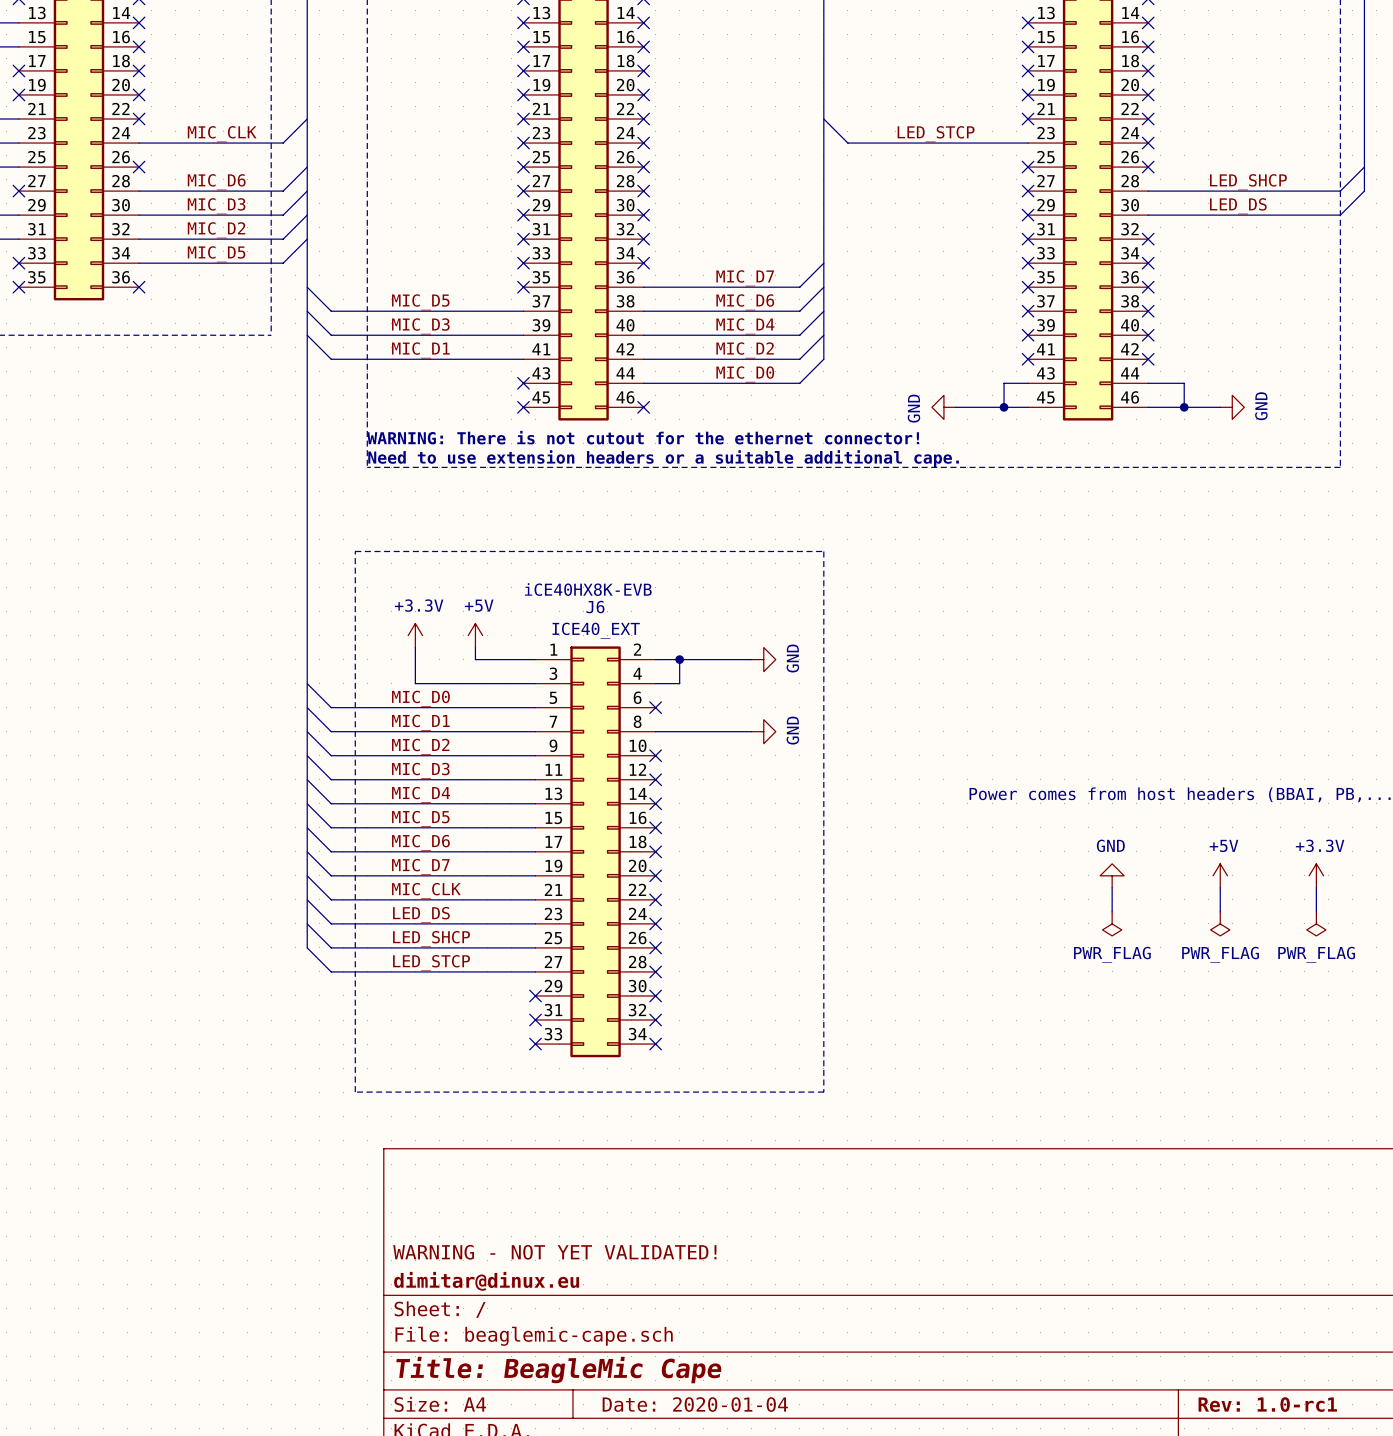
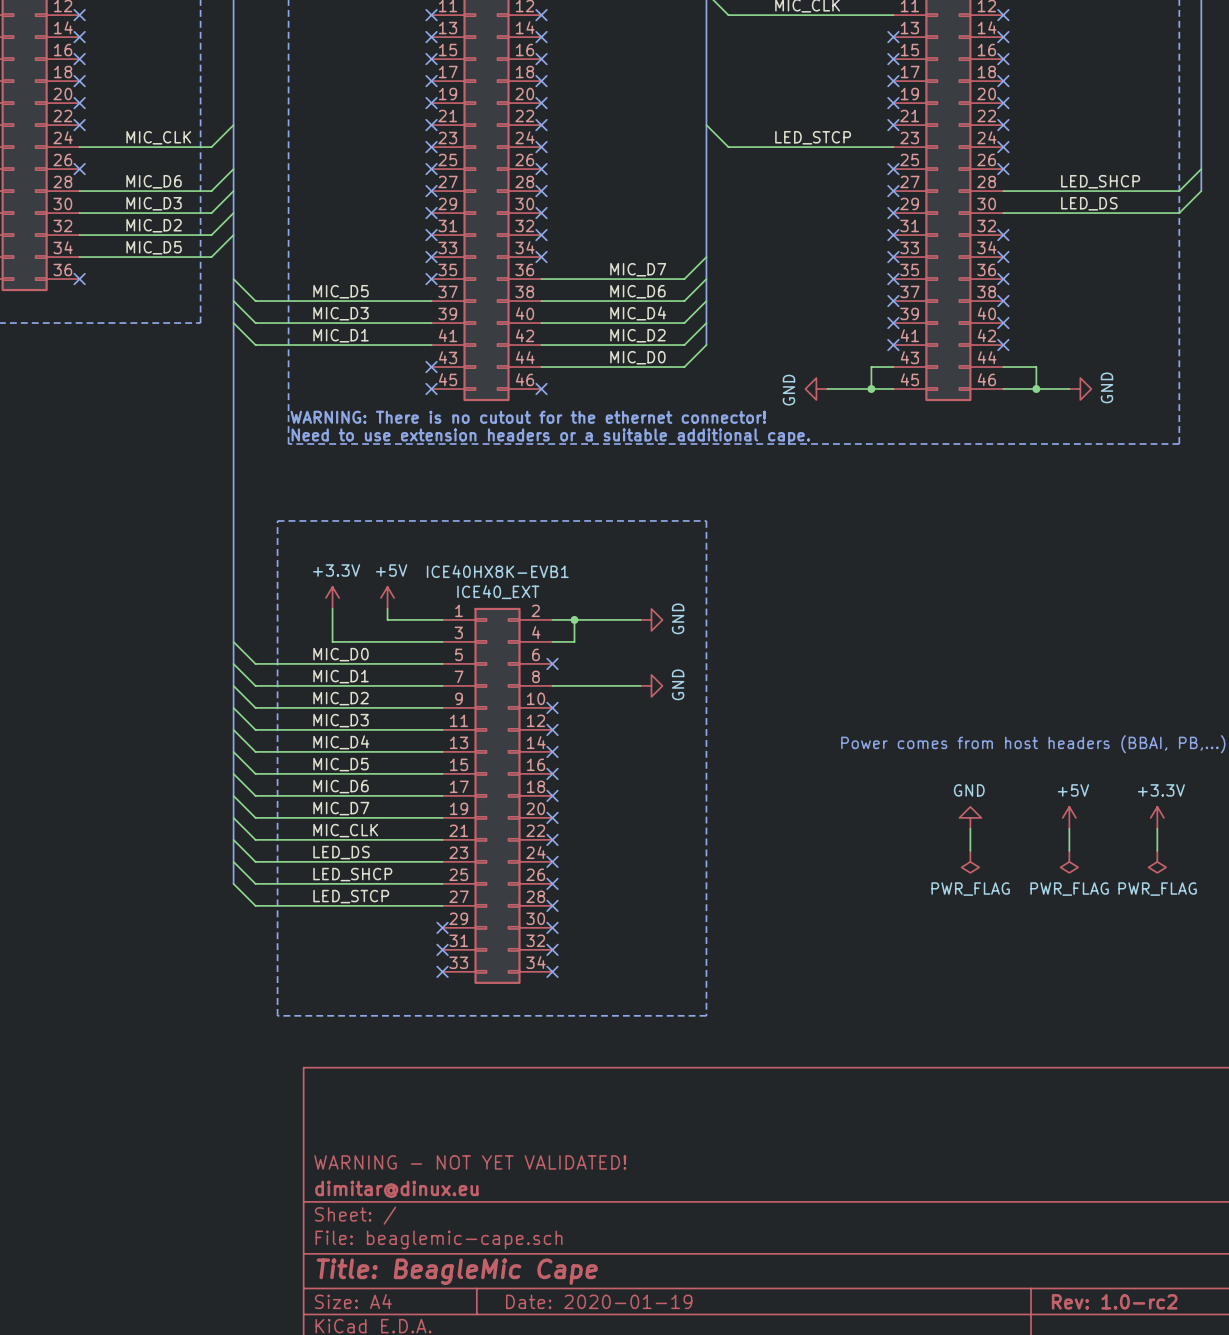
text: WARNING: There is not cutout for the ethernet connector! (643, 437) -> WARNING: There is no cutout for the ethernet connector! (528, 417)
text: iCE40HX8K-EVB (588, 589) -> none
J6 name: J6 (595, 607) -> ICE40HX8K-EVB1 (497, 571)
title block: Date: 2020-01-04 (695, 1404) -> Date: 2020-01-19 (599, 1301)
title block: Rev: 1.0-rc1 (1267, 1404) -> Rev: 1.0-rc2 (1114, 1301)

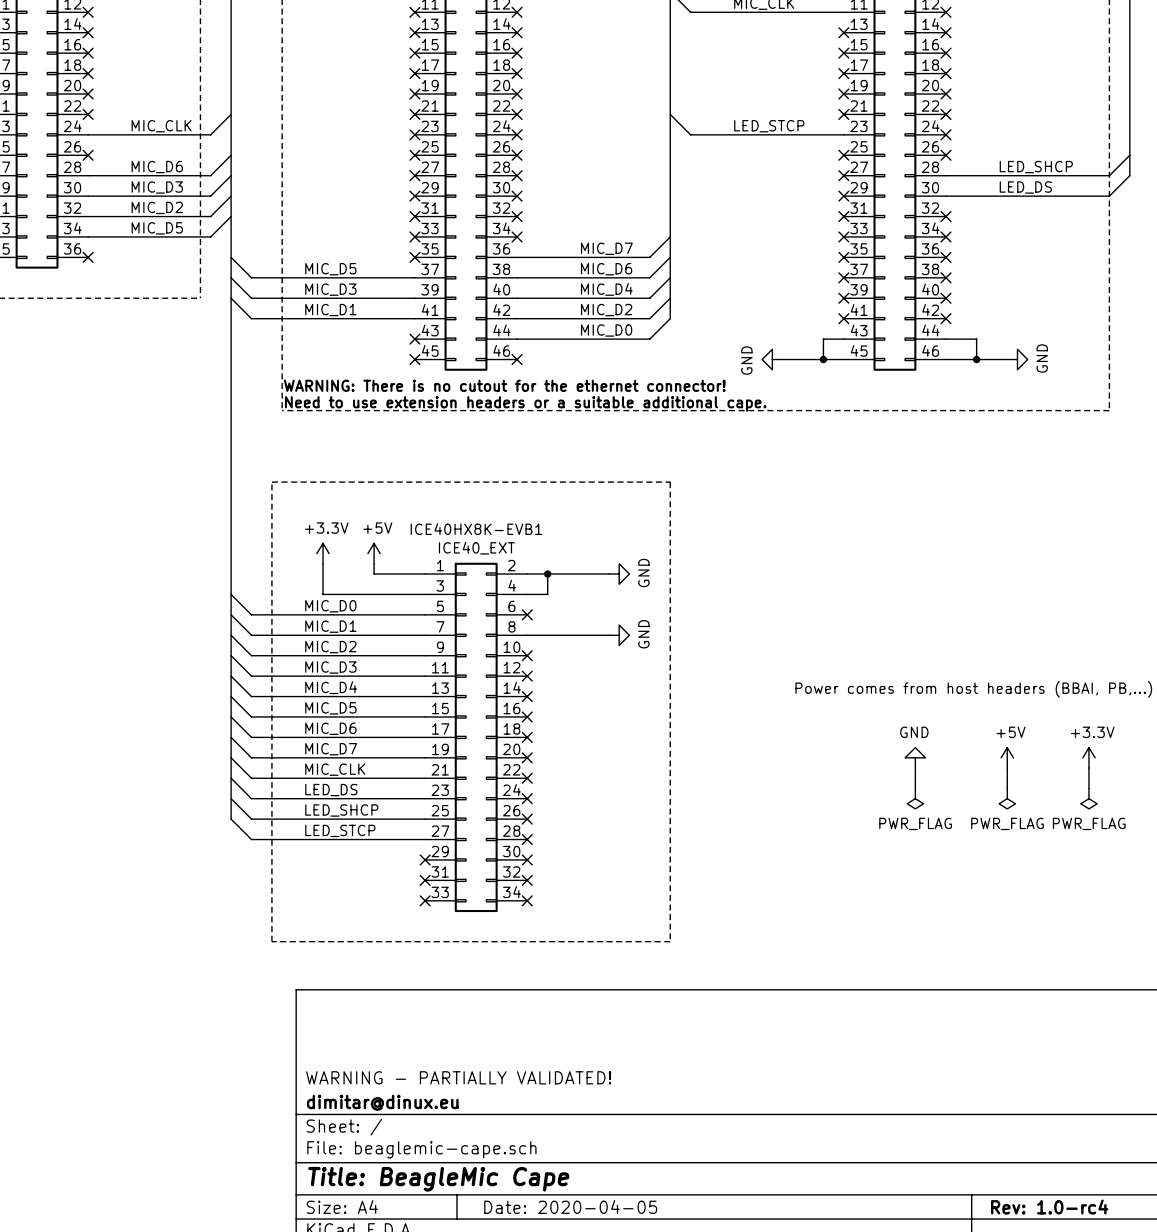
title block: WARNING - NOT YET VALIDATED! (470, 1162) -> WARNING - PARTIALLY VALIDATED! (458, 1077)
title block: Date: 2020-01-19 (599, 1301) -> Date: 2020-04-05 (570, 1207)
title block: Rev: 1.0-rc2 (1114, 1301) -> Rev: 1.0-rc4 (1049, 1207)

